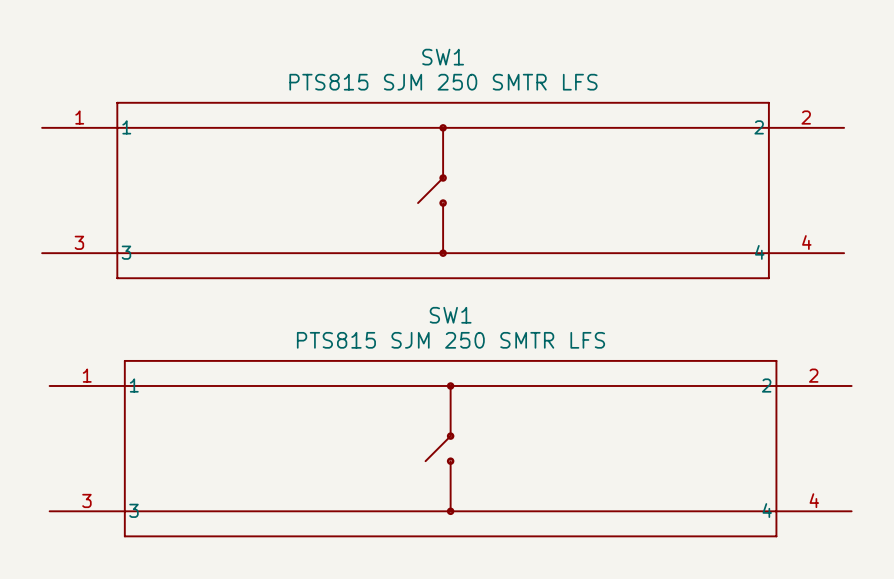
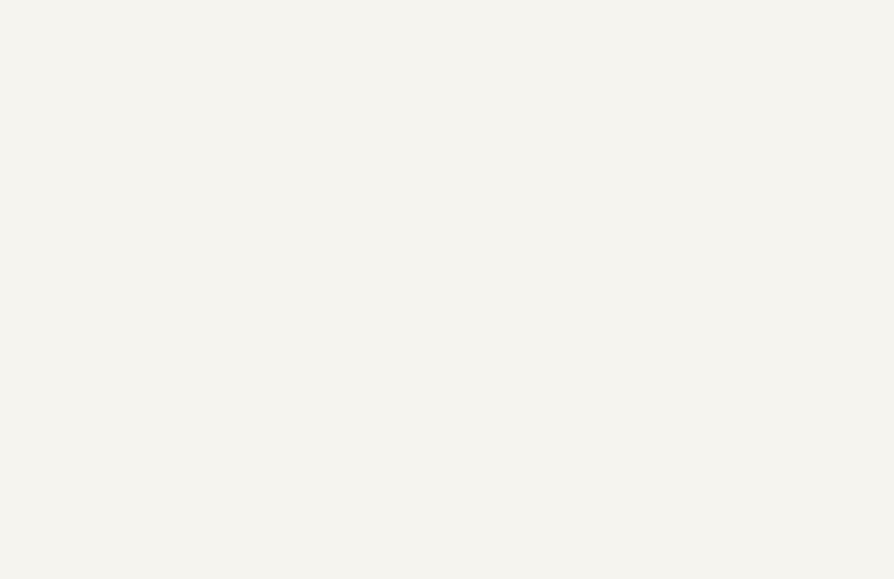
SW1: PTS815 SJM 250 SMTR LFS (443, 190) -> none
SW1: PTS815 SJM 250 SMTR LFS (450, 448) -> none

